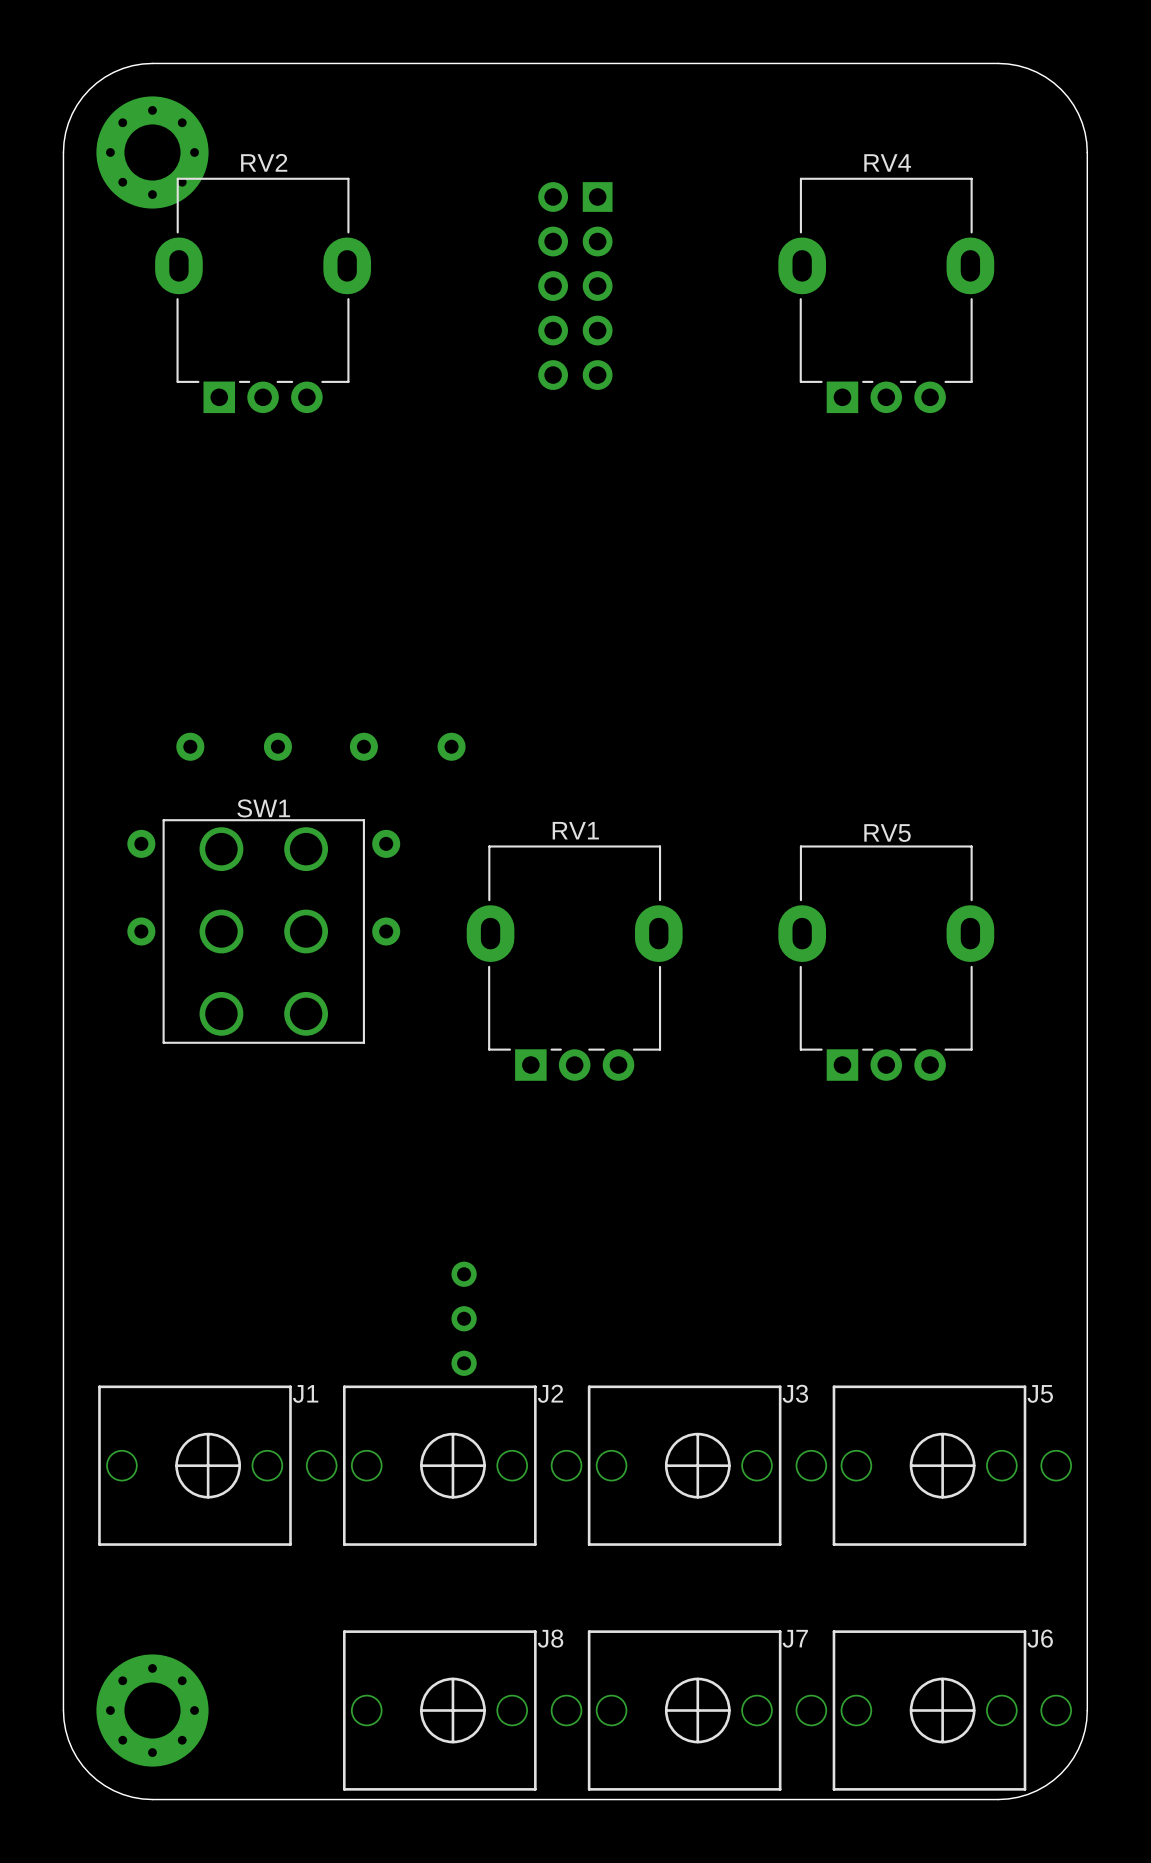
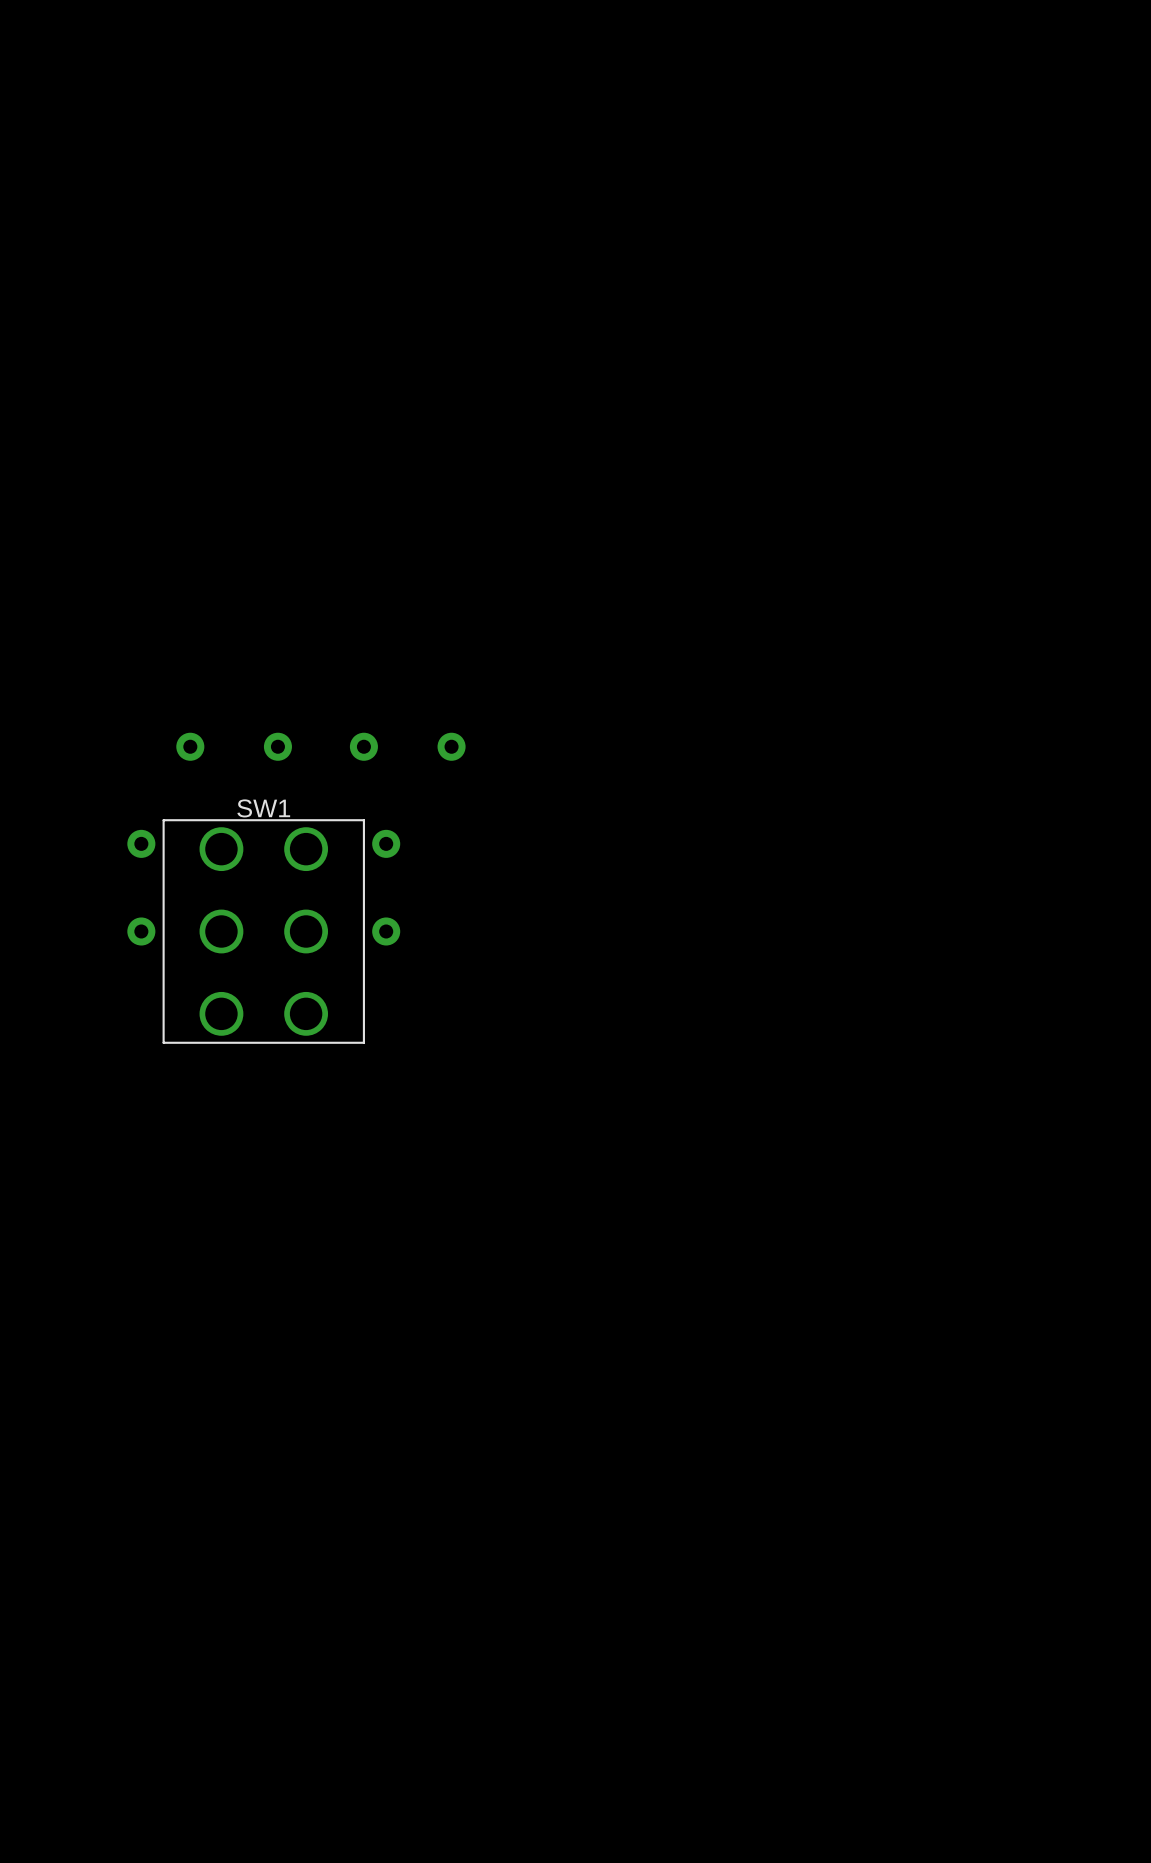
board edge: (152, 63) (998, 63) (1018, 65) (1045, 77) (1061, 89) (1078, 113) (1085, 132) (1087, 152) (1087, 1710) (1085, 1730) (1073, 1757) (1061, 1773) (1036, 1790) (1018, 1797) (998, 1799) (152, 1799) (123, 1794) (105, 1785) (82, 1766) (72, 1749) (65, 1730) (63, 1710) (63, 152) (68, 123) (77, 105) (89, 89) (113, 72) (132, 65) (152, 63) -> none
part: (152, 152) -> none
part: (575, 286) -> none
RV2: (263, 295) -> none
RV4: (886, 295) -> none
RV1: (574, 963) -> none
RV5: (886, 963) -> none
part: (464, 1318) -> none
J1: (217, 1465) -> none
J2: (462, 1465) -> none
J3: (707, 1465) -> none
J5: (952, 1465) -> none
part: (152, 1710) -> none
J8: (462, 1710) -> none
J7: (707, 1710) -> none
J6: (952, 1710) -> none

